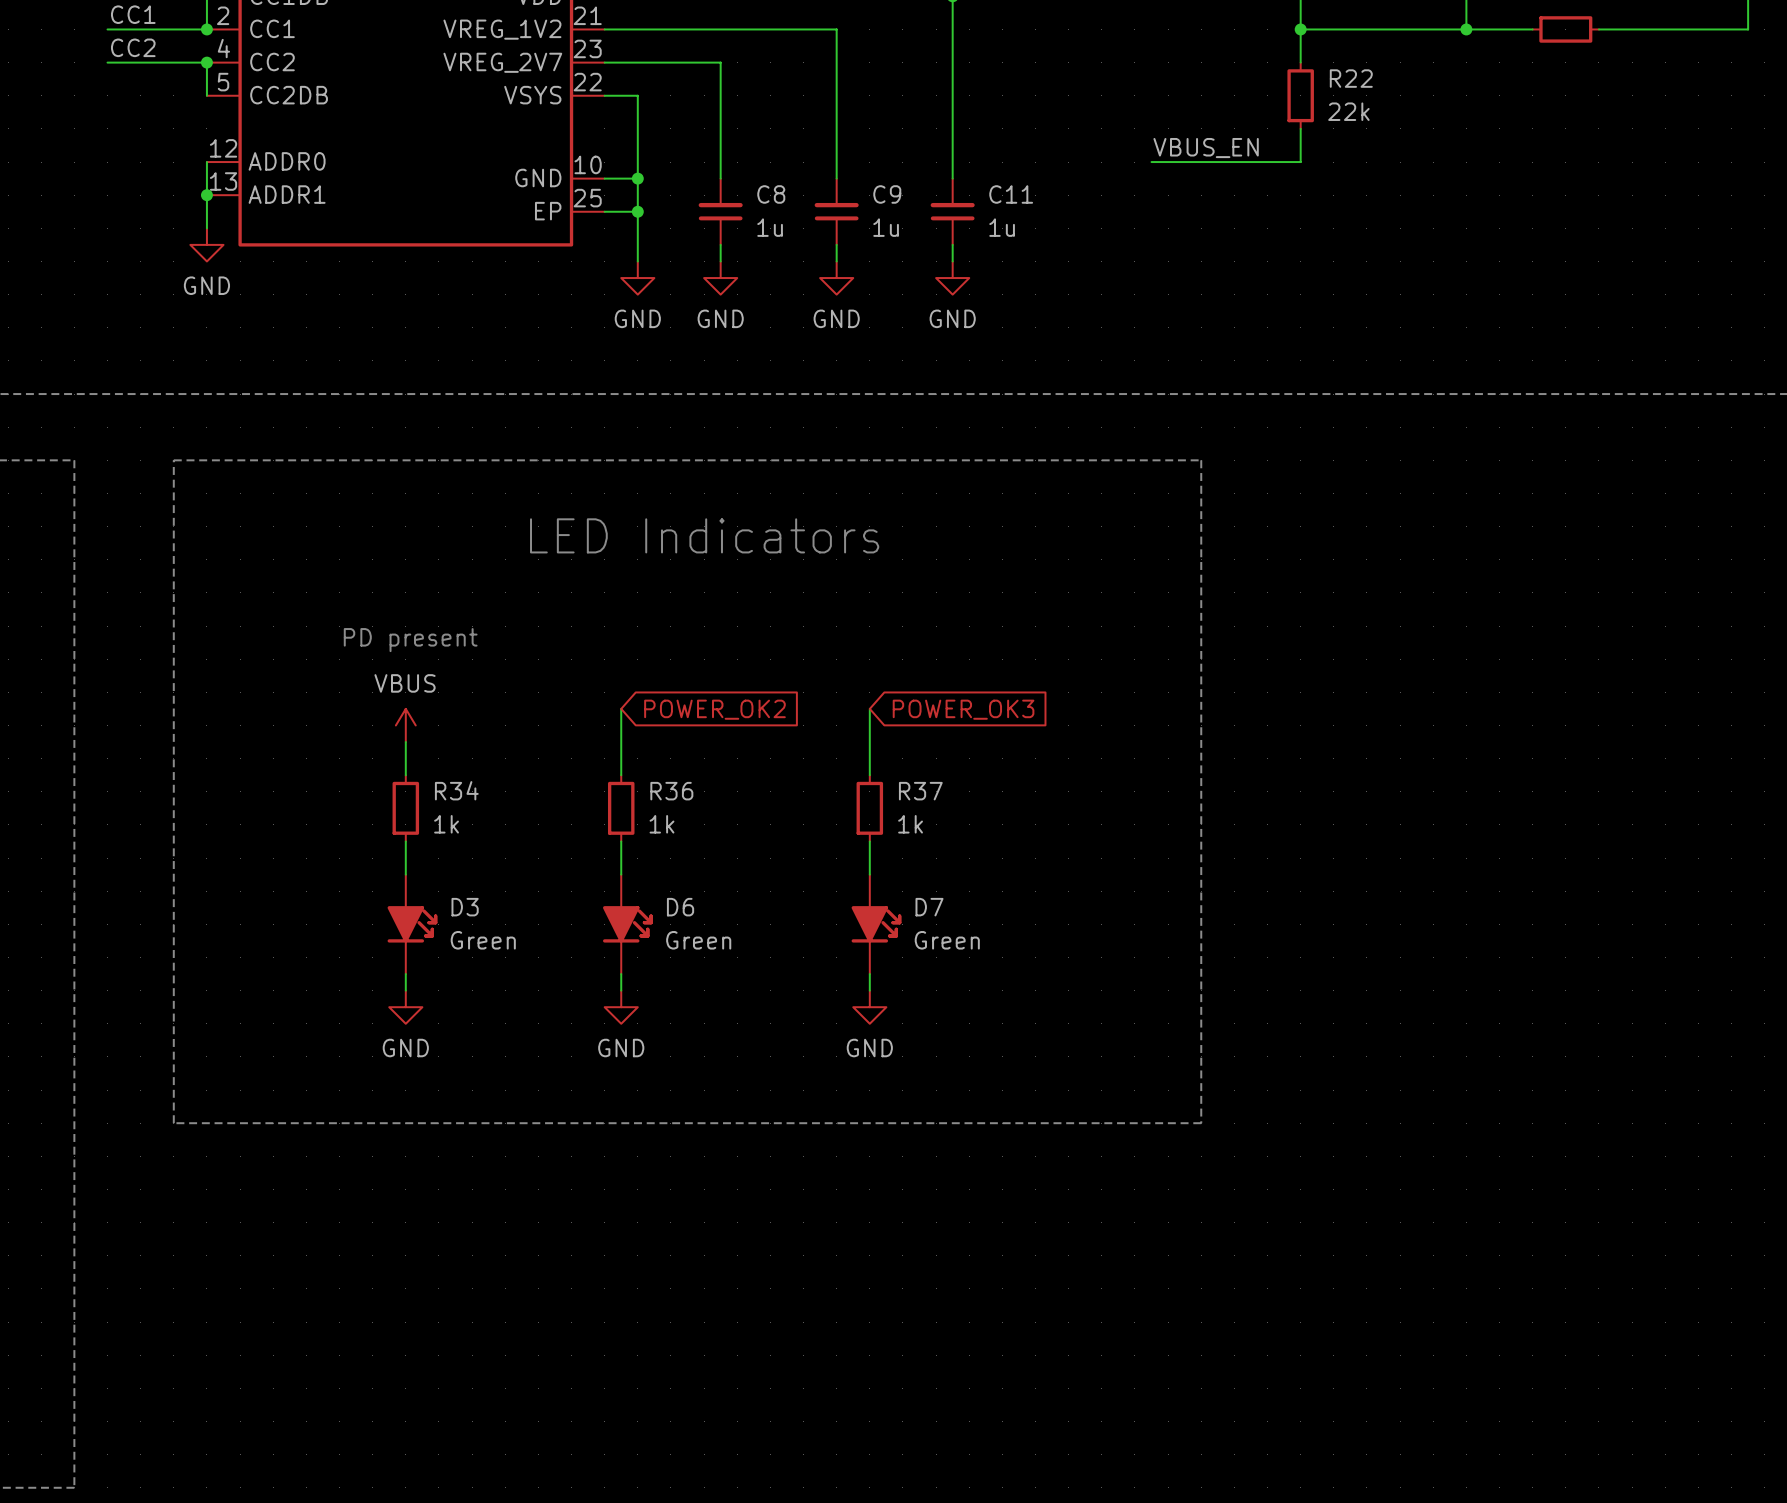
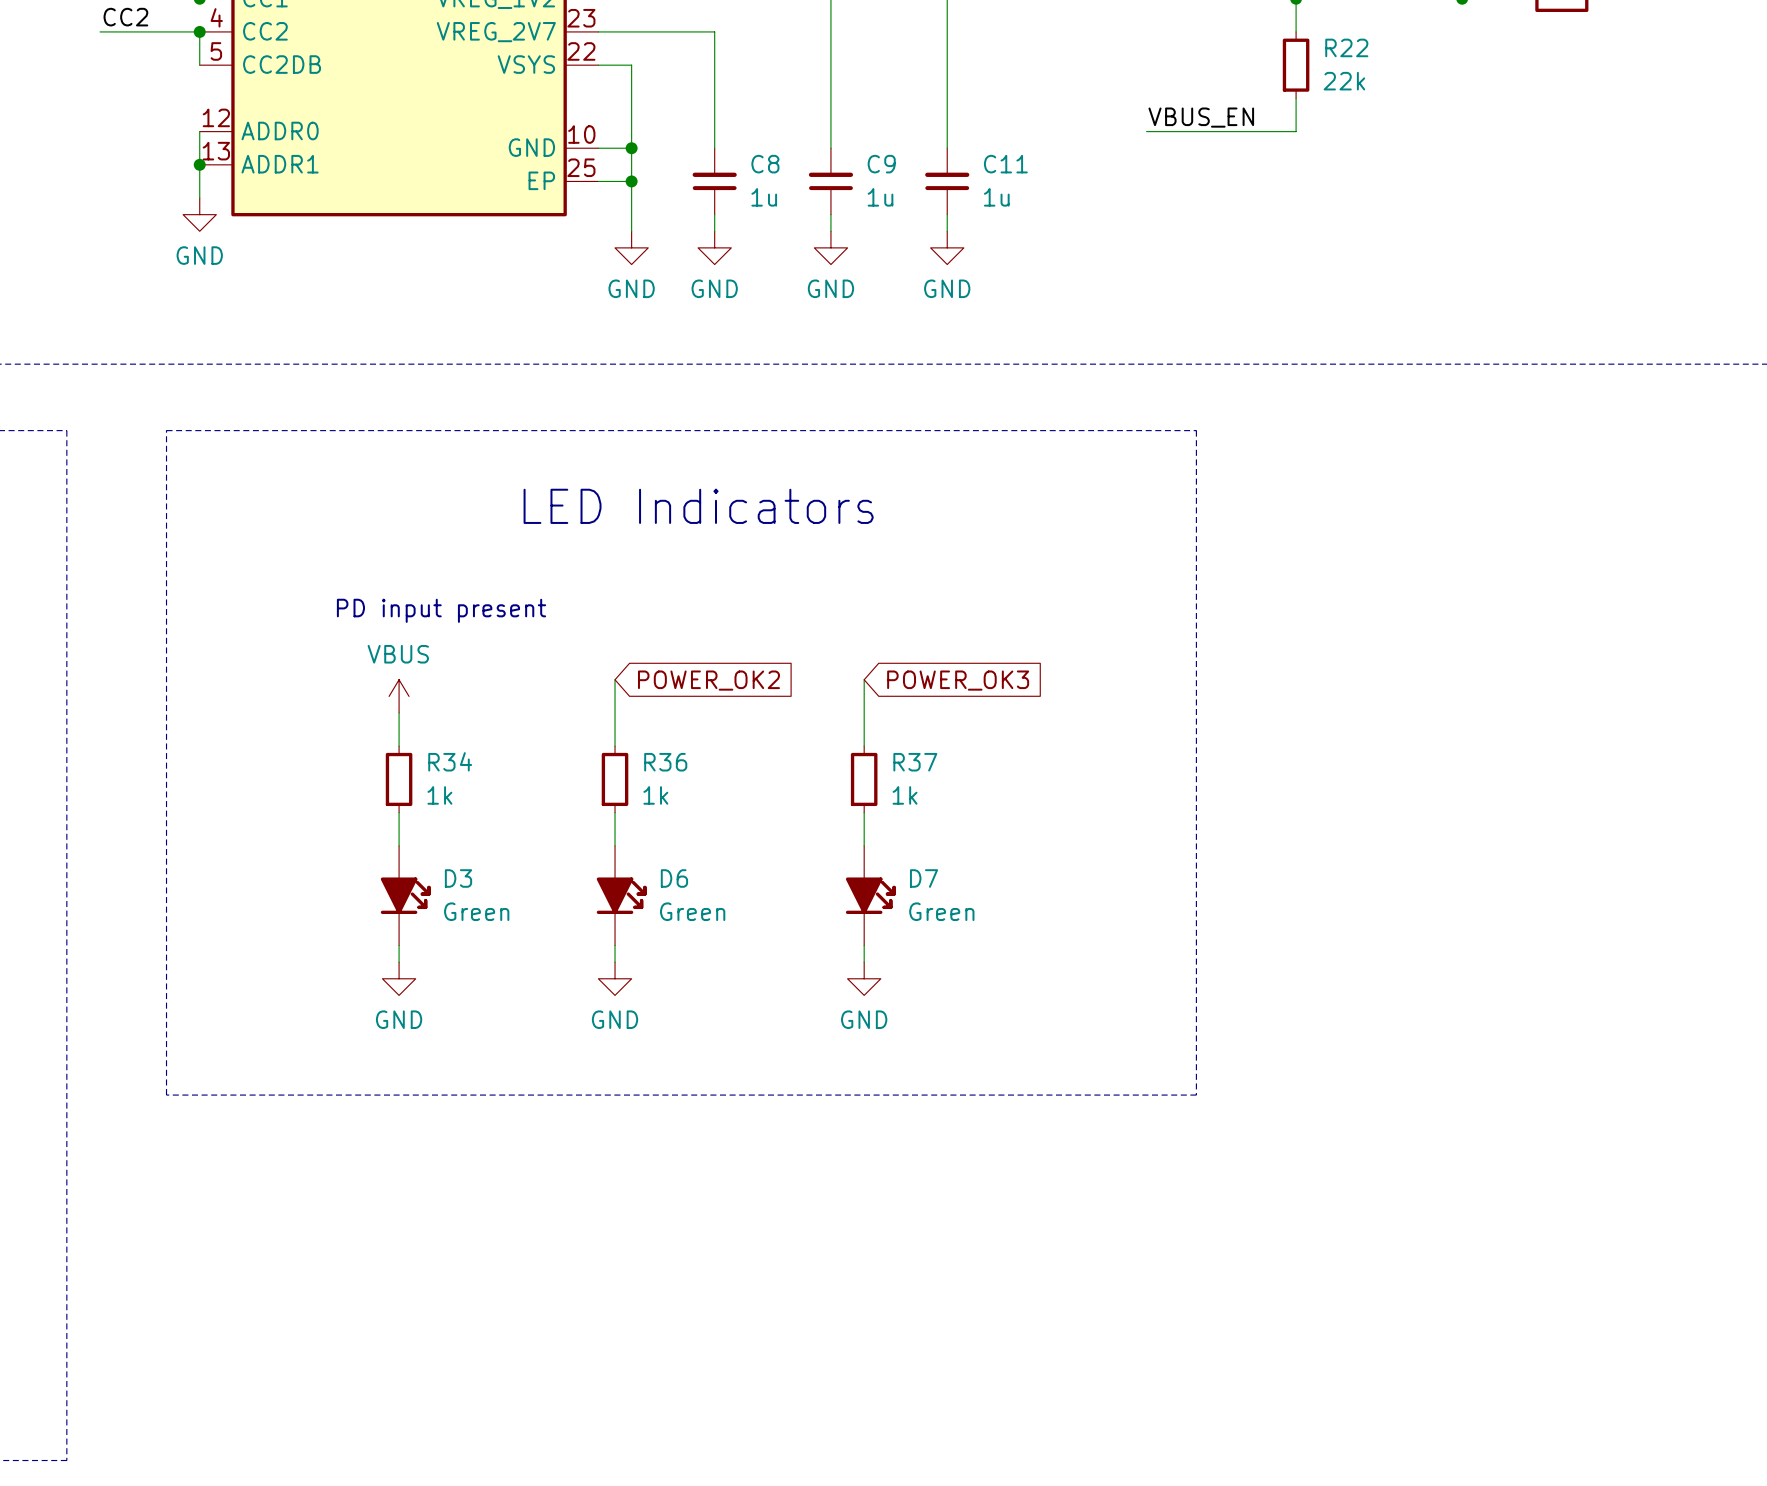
text: PD present (410, 640) -> PD input present (441, 610)

